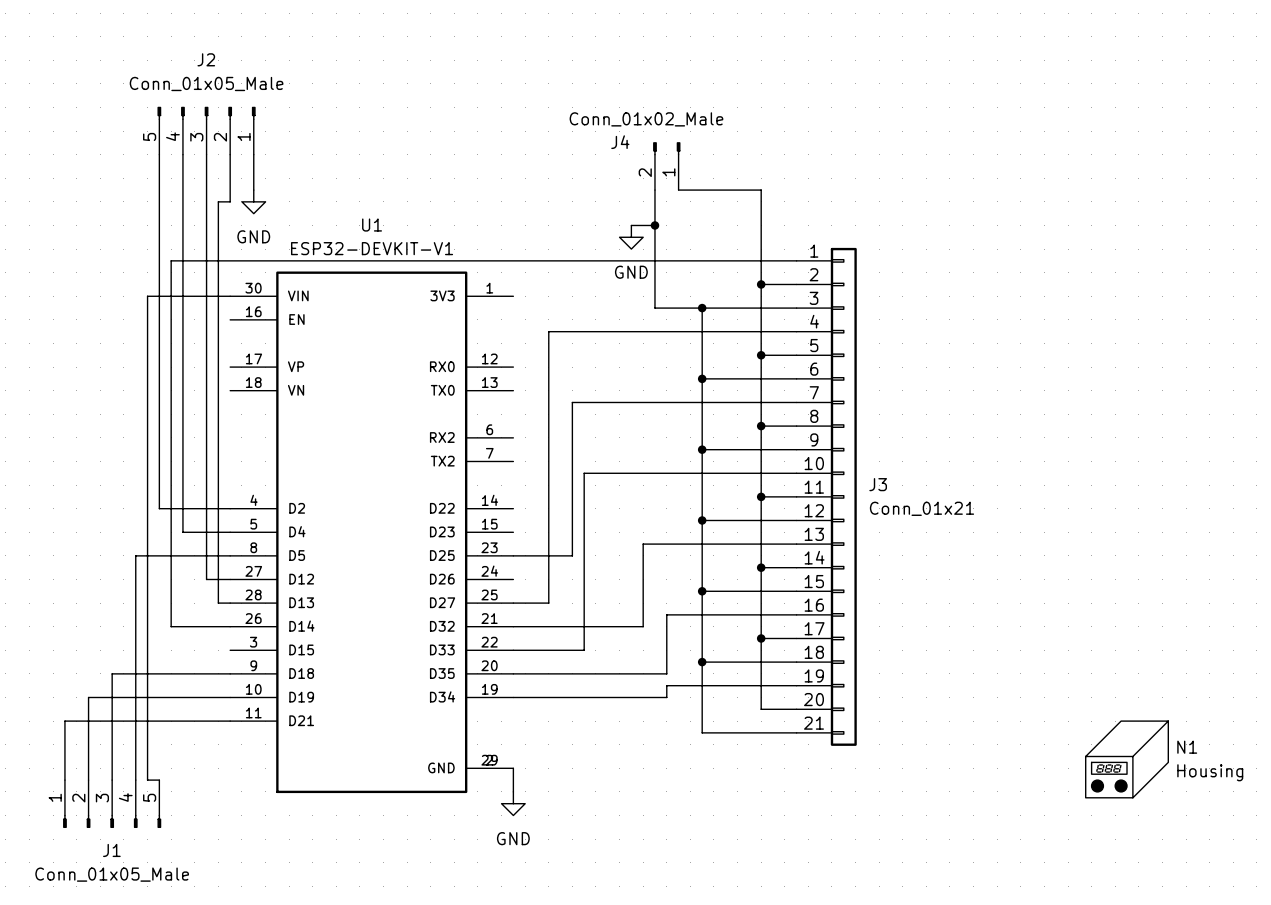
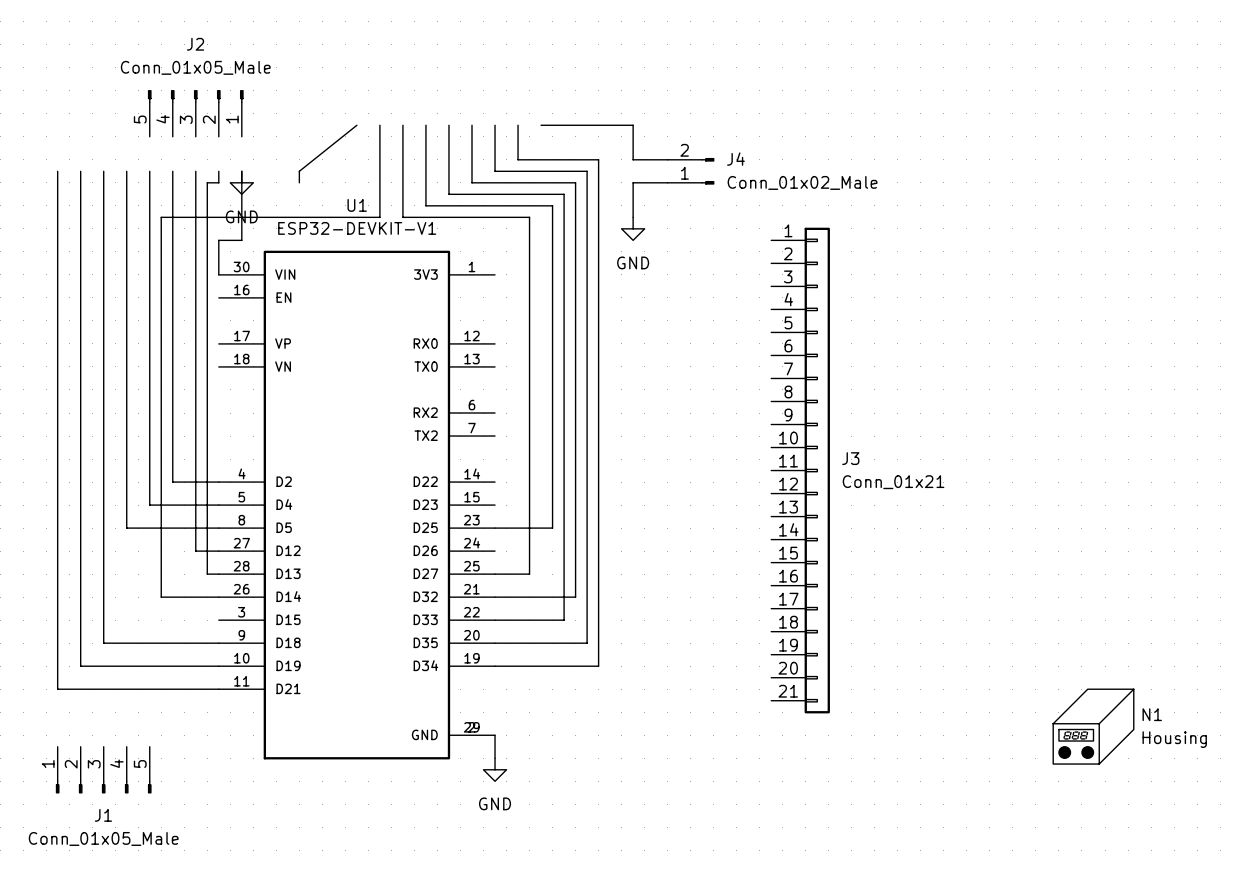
J4 value position: Conn_01x02_Male (646, 119) -> Conn_01x02_Male (802, 182)
wire: none -> (356, 125) (299, 171) (299, 182)
wire: none -> (379, 125) (379, 217) (161, 217) (161, 240)
wire: none -> (541, 125) (633, 125) (633, 159) (667, 159)
J4 name position: J4 (620, 142) -> J4 (735, 159)
J4 rotation: 0° (666, 148) -> 90° clockwise (707, 171)
wire: (159, 154) (159, 190) -> none
wire: (182, 154) (182, 190) -> none
wire: (206, 154) (206, 190) -> none
wire: (230, 154) (230, 190) -> none
wire: (253, 154) (253, 190) -> (241, 240) (241, 171)
J4 position: (666, 166) -> (691, 171)
wire: (654, 190) (654, 201) -> (667, 182) (633, 182)
wire: (678, 190) (761, 190) (761, 709) (796, 709) -> none
wire: (631, 225) (654, 225) -> none
junction: (654, 225) -> none
power symbol position: GND (631, 237) -> GND (633, 228)
wire: (654, 237) (654, 308) (796, 308) -> none
wire: (171, 260) (230, 260) -> (218, 274) (218, 240)
wire: (253, 260) (796, 260) -> none
wire: (761, 284) (796, 284) -> none
junction: (761, 284) -> none
wire: (230, 296) (147, 296) (147, 780) (159, 780) -> none
wire: (702, 308) (702, 732) (796, 732) -> none
junction: (702, 308) -> none
wire: (548, 331) (796, 331) -> (529, 309) (529, 217) (402, 217) (402, 125)
wire: (761, 355) (796, 355) -> none
junction: (761, 355) -> none
wire: (702, 378) (796, 378) -> none
junction: (702, 378) -> none
wire: (572, 402) (796, 402) -> (552, 378) (552, 205) (425, 205) (425, 125)
wire: (761, 426) (796, 426) -> none
junction: (761, 426) -> none
wire: (702, 449) (796, 449) -> none
junction: (702, 449) -> none
wire: (584, 473) (796, 473) -> (564, 447) (564, 194) (448, 194) (448, 125)
wire: (761, 496) (796, 496) -> none
junction: (761, 496) -> none
wire: (159, 508) (182, 508) (182, 532) -> (149, 482) (149, 505) (172, 505)
wire: (702, 520) (796, 520) -> none
junction: (702, 520) -> none
wire: (796, 544) (643, 544) (643, 626) (595, 626) -> (472, 125) (472, 182) (575, 182) (575, 597)
wire: (135, 555) (135, 780) -> (126, 528) (126, 171)
wire: (761, 567) (796, 567) -> none
junction: (761, 567) -> none
wire: (702, 591) (796, 591) -> none
junction: (702, 591) -> none
wire: (796, 614) (666, 614) (666, 673) (607, 673) -> (495, 125) (495, 171) (587, 171) (587, 643)
wire: (761, 638) (796, 638) -> none
junction: (761, 638) -> none
wire: (702, 662) (796, 662) -> none
junction: (702, 662) -> none
wire: (112, 673) (112, 780) -> (103, 643) (103, 171)
wire: (796, 685) (666, 685) (666, 697) (619, 697) -> (518, 125) (518, 159) (598, 159) (598, 666)
wire: (88, 697) (88, 780) -> (80, 666) (80, 171)
wire: (64, 721) (64, 780) -> (57, 689) (57, 171)

